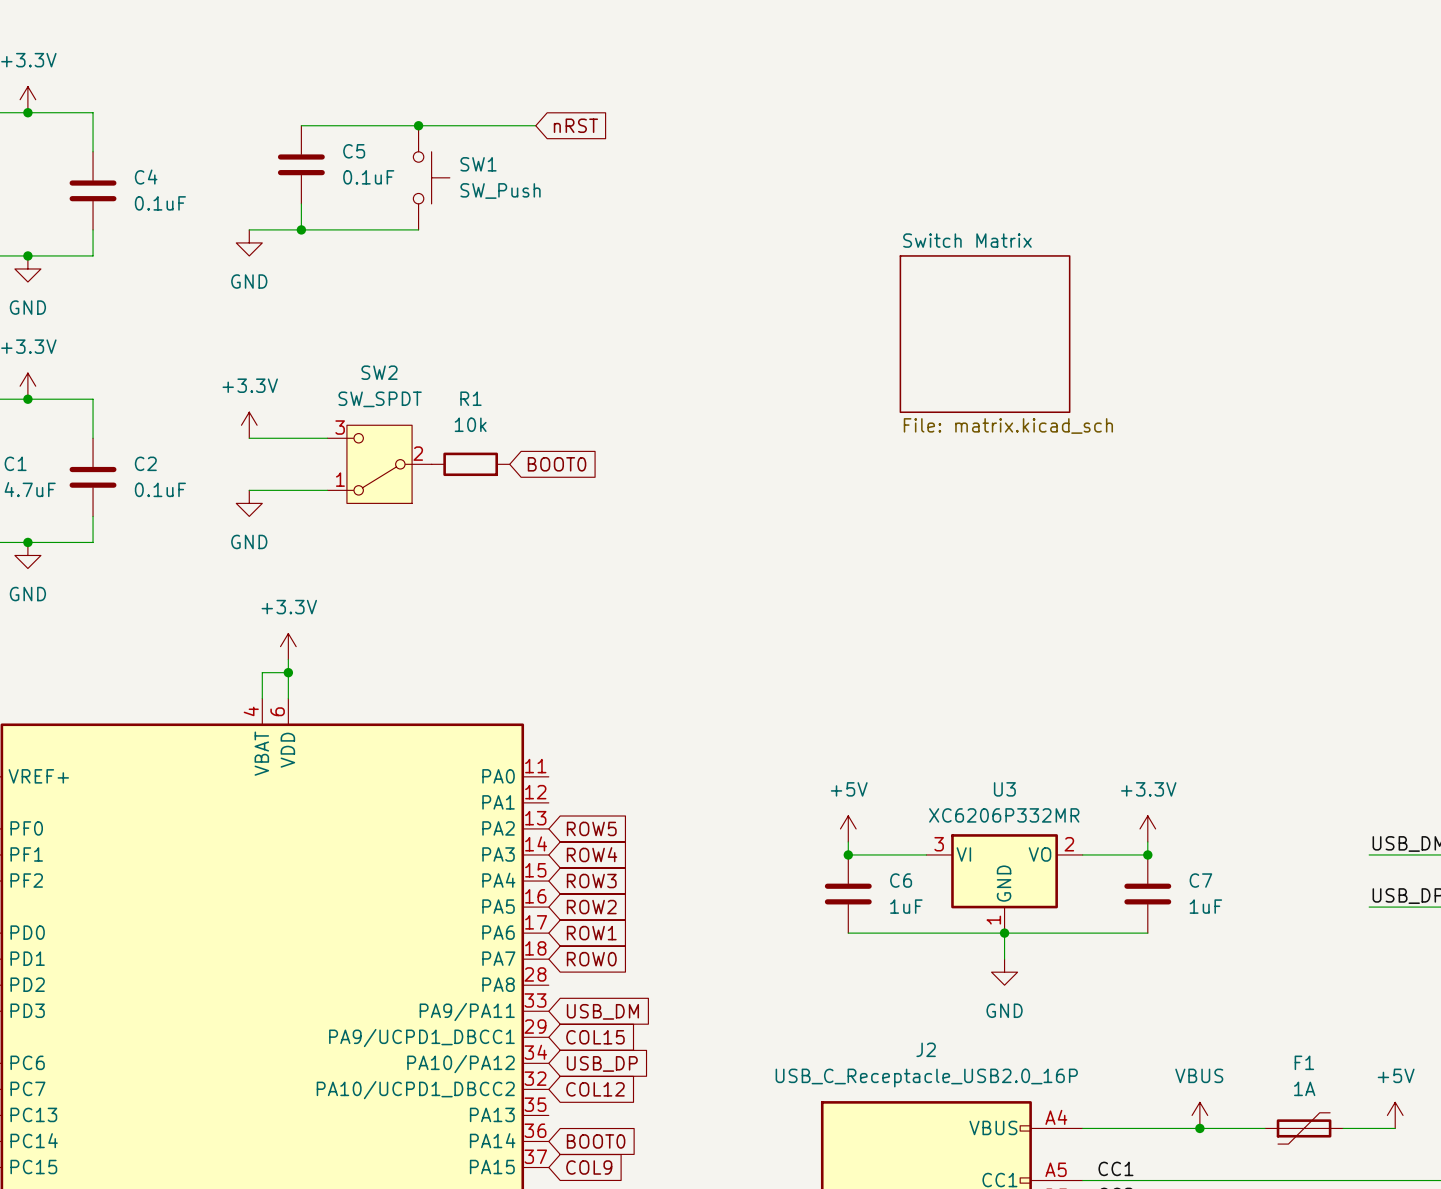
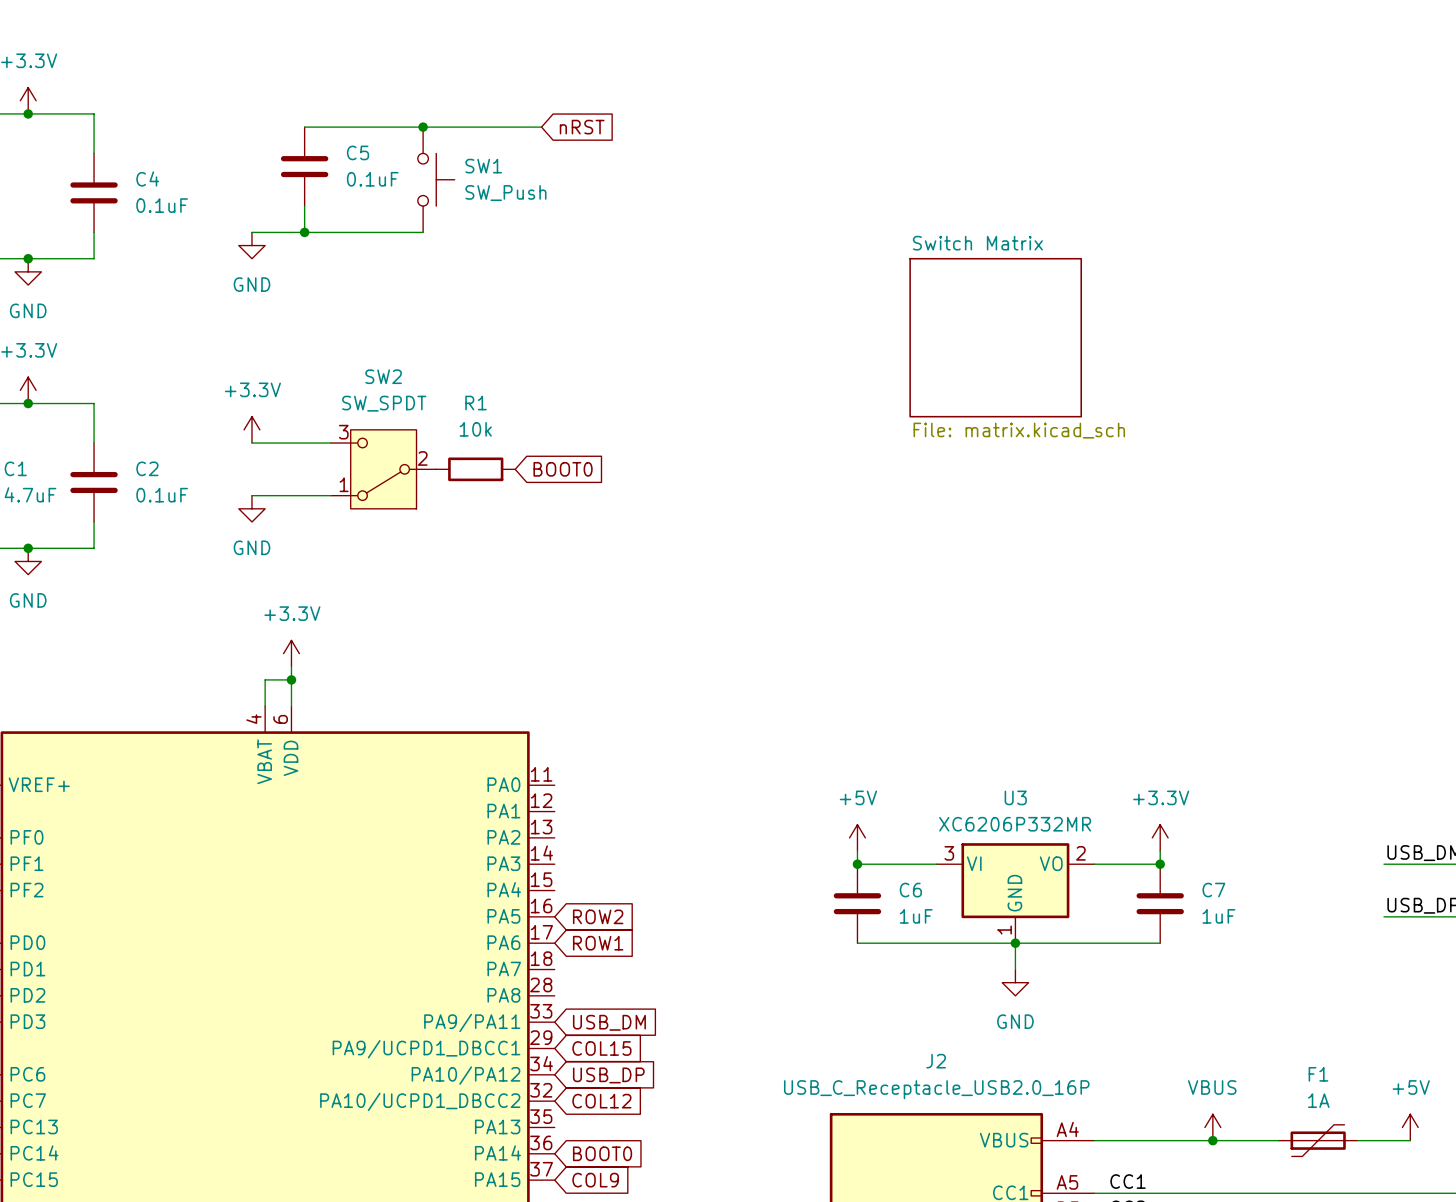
global label: ROW5 (591, 828) -> none
global label: ROW4 (592, 854) -> none
global label: ROW3 (591, 881) -> none
global label: ROW0 (591, 959) -> none

